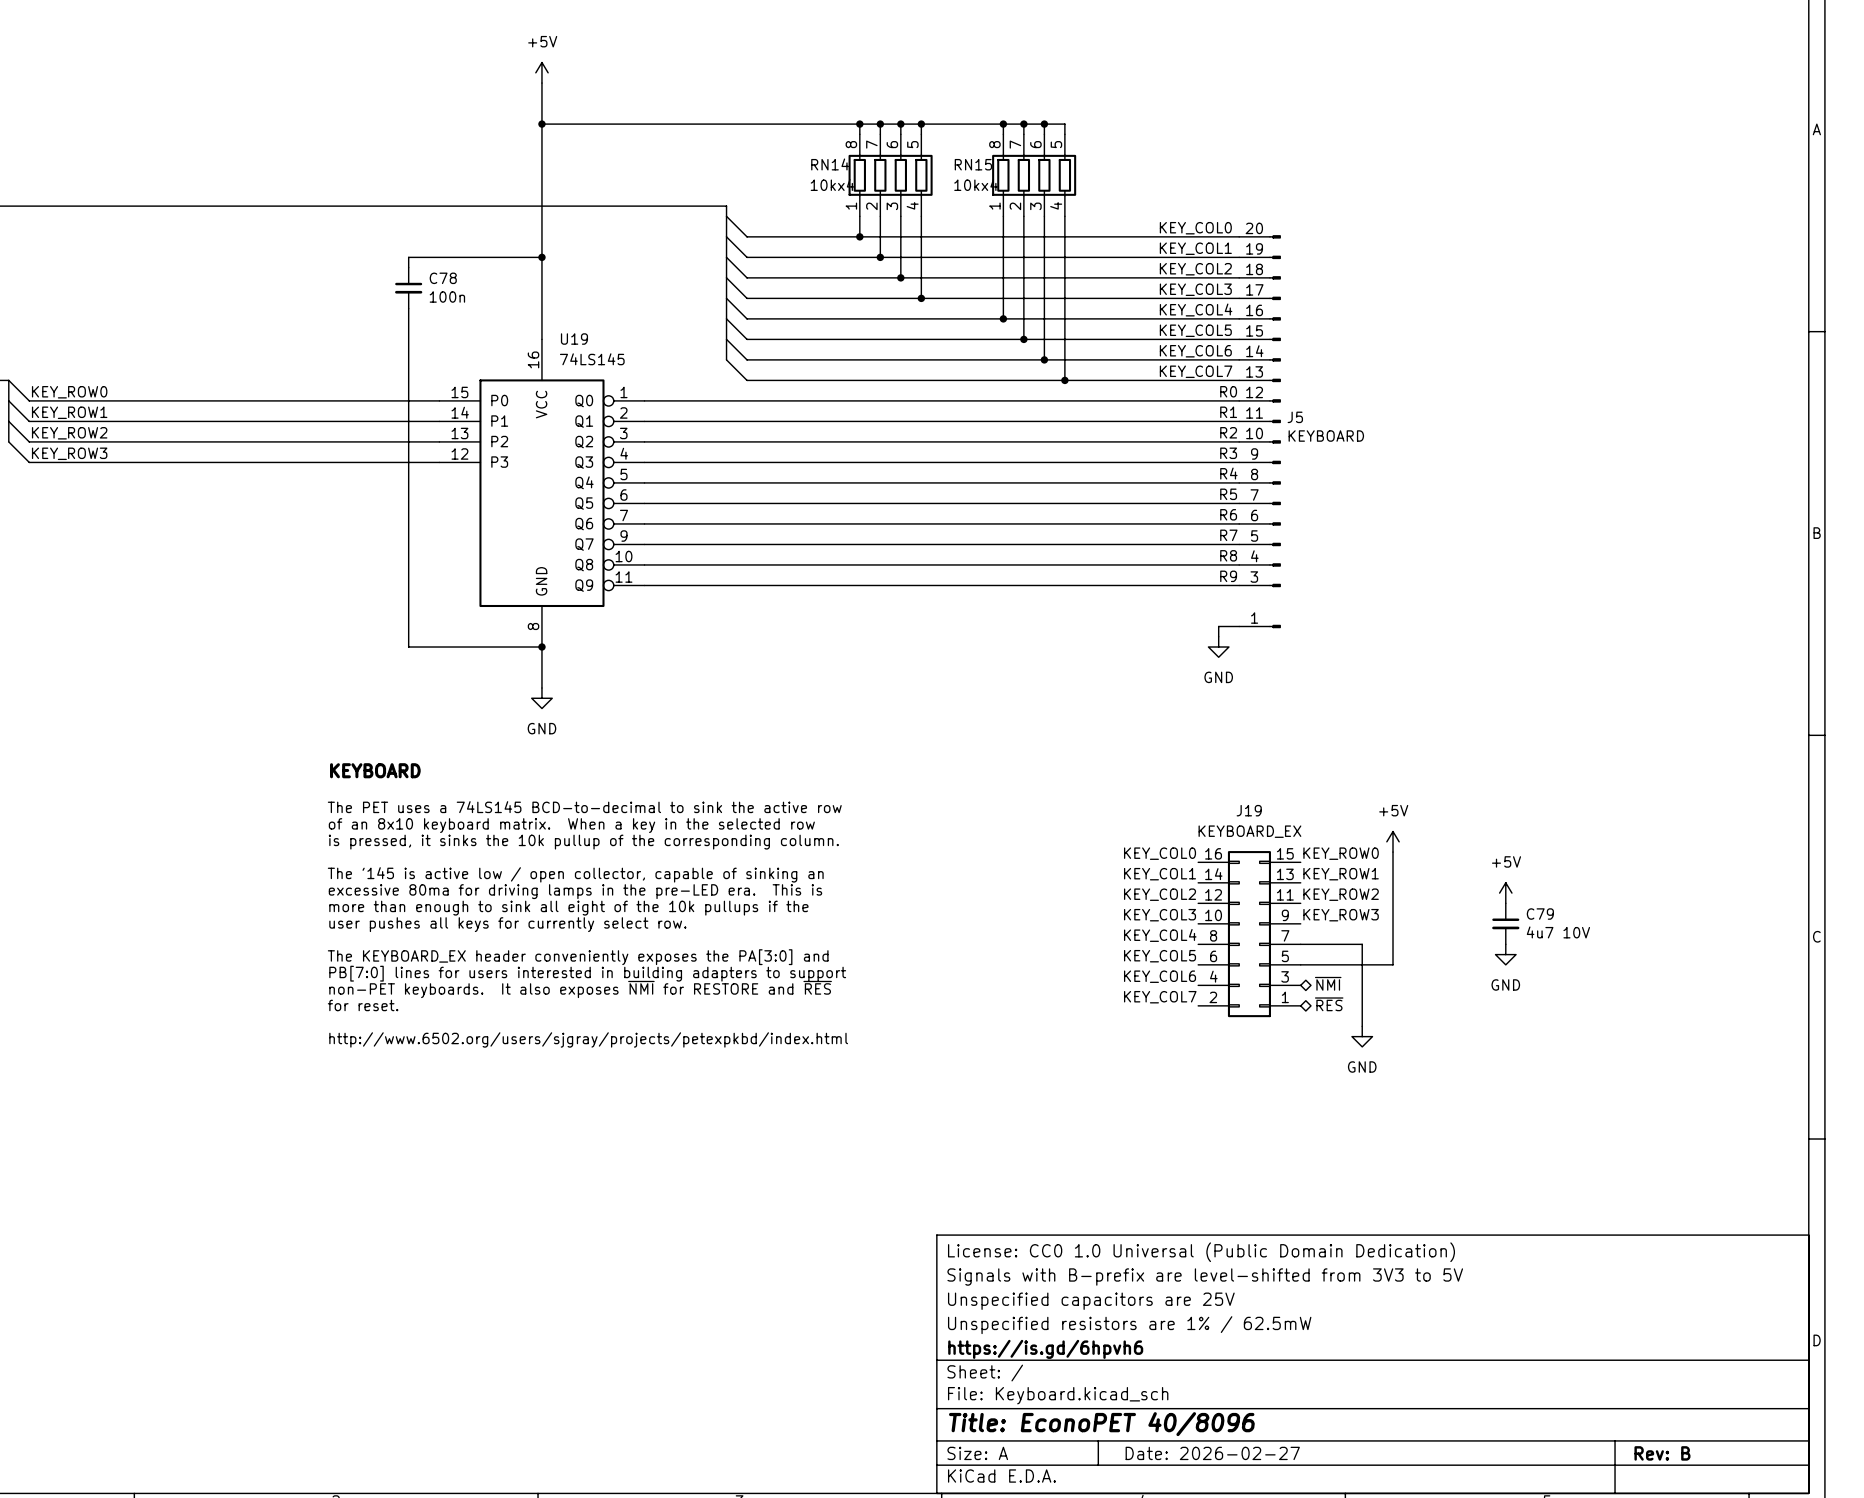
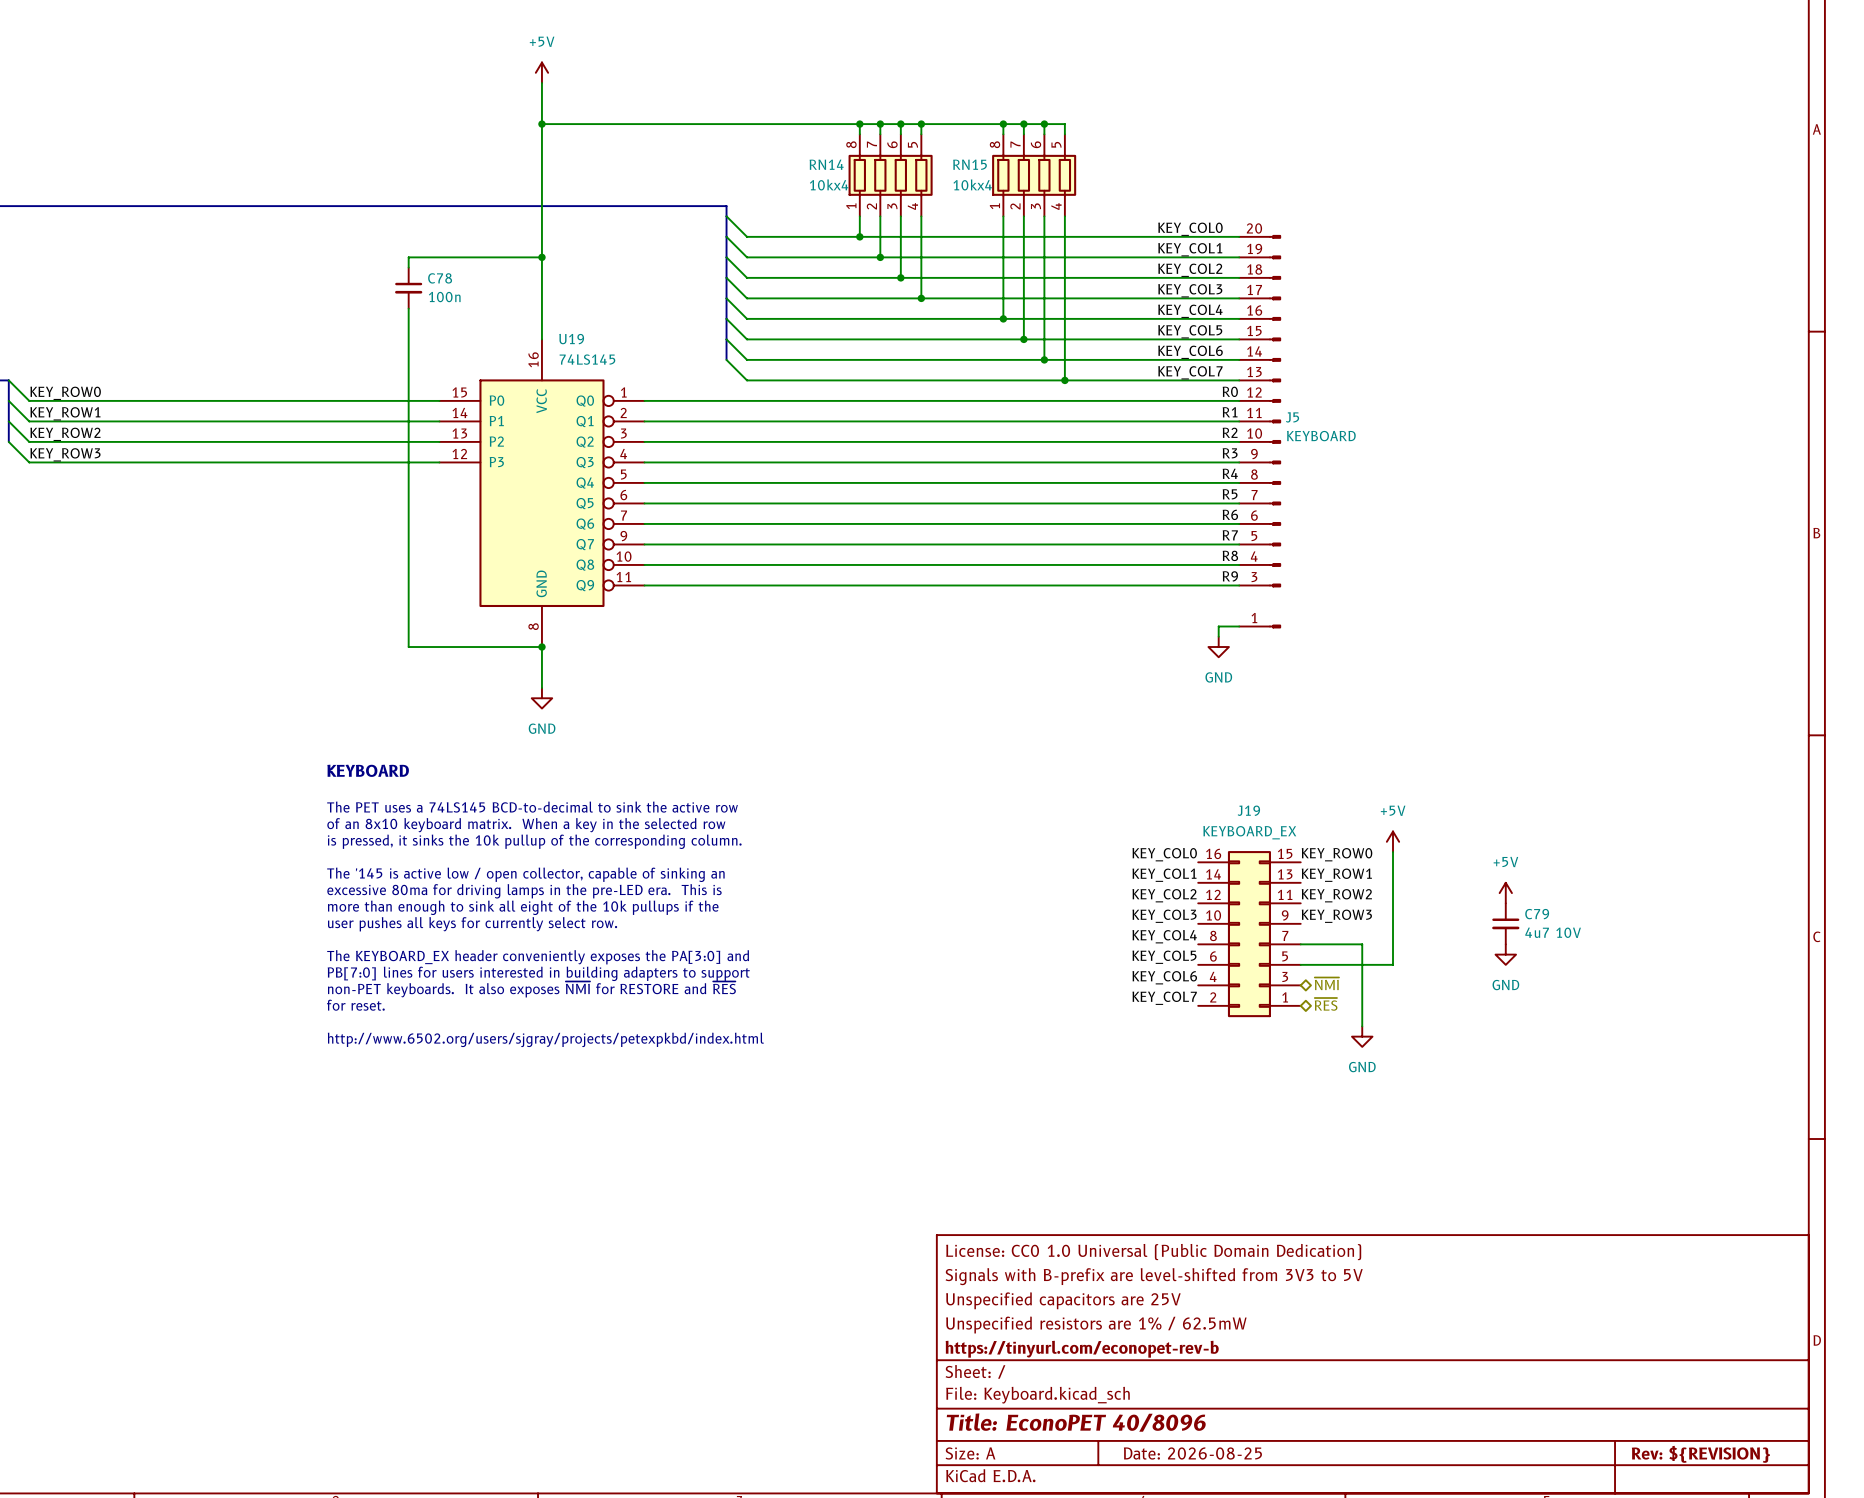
title block: https://is.gd/6hpvh6 (1045, 1349) -> https://tinyurl.com/econopet-rev-b (1082, 1349)
title block: Date: 2026-02-27 (1212, 1453) -> Date: 2026-08-25 (1192, 1453)
title block: Rev: B (1662, 1453) -> Rev: ${REVISION} (1700, 1454)

